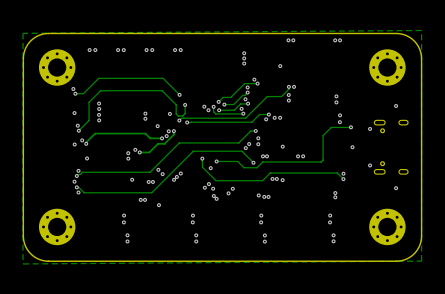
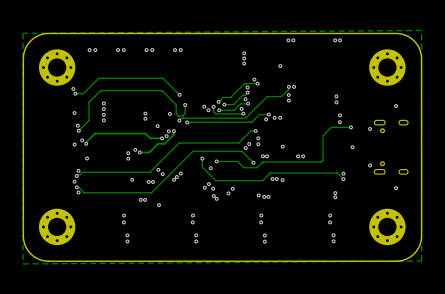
via: (99, 103) -> none
via: none -> (103, 103)
via: (99, 109) -> none
via: none -> (103, 109)
via: (99, 114) -> none
via: none -> (103, 114)
via: (99, 120) -> none
via: none -> (103, 120)

